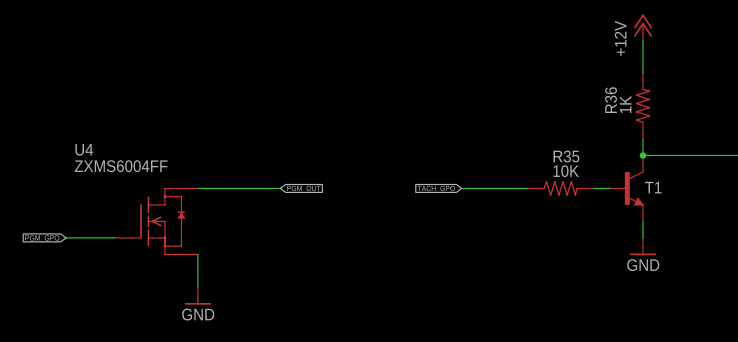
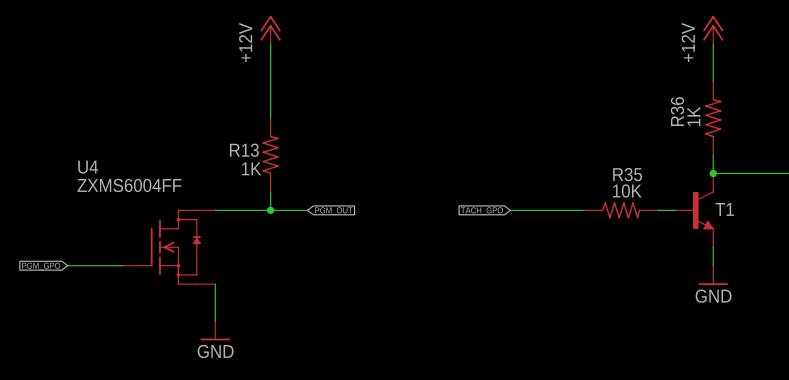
power symbol: none -> +12V (270, 30)
wire: none -> (270, 44) (270, 118)
R13: none -> 1K (270, 155)
wire: none -> (270, 191) (270, 210)
junction: none -> (270, 210)

